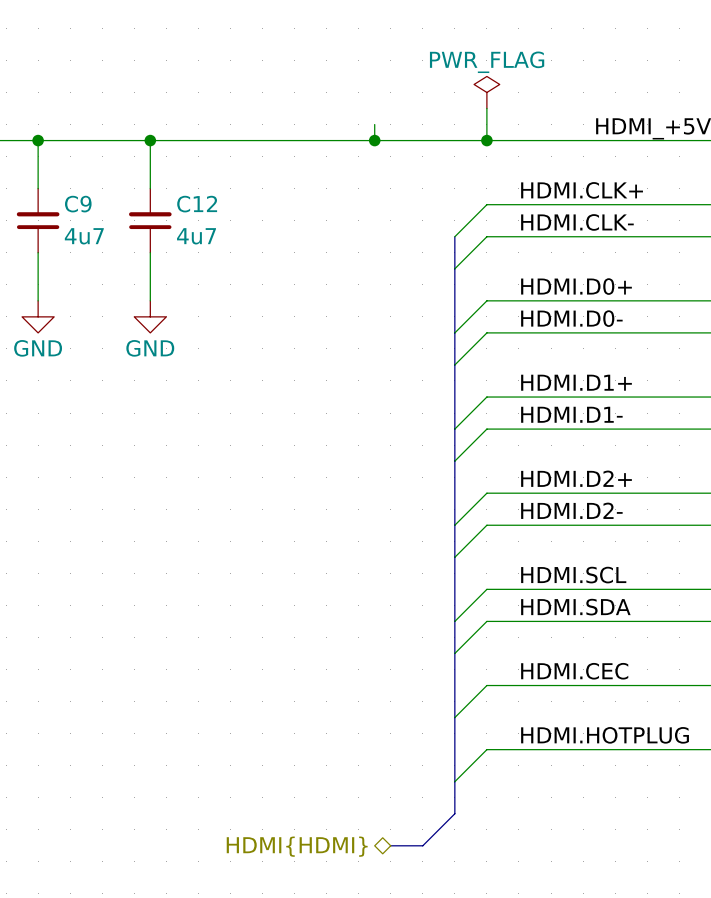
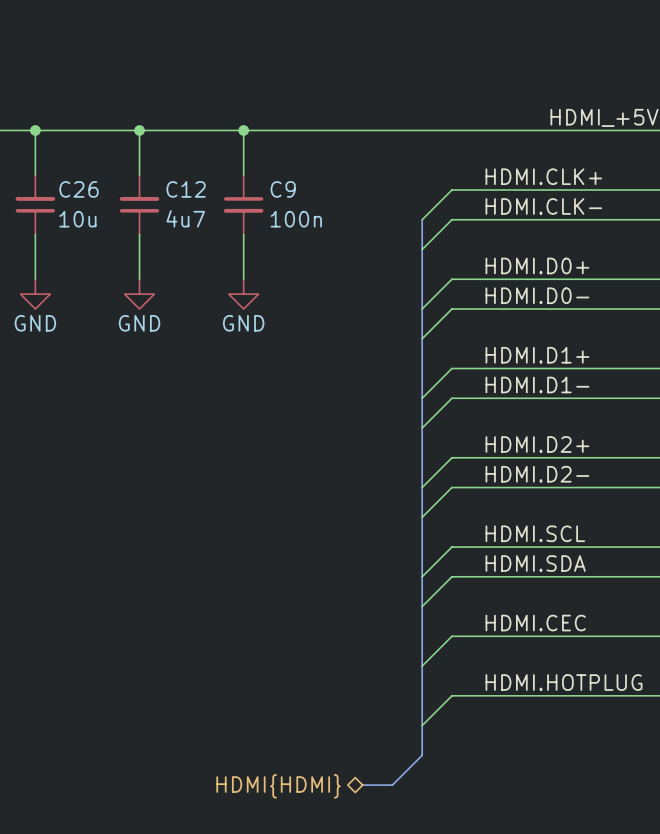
power symbol: PWR_FLAG (486, 92) -> none
wire: (486, 108) (486, 140) -> none
wire: (374, 124) (374, 140) -> none
wire: none -> (243, 130) (243, 175)
junction: none -> (243, 130)
junction: (374, 140) -> none
junction: (486, 140) -> none
C9 name: C9 (78, 204) -> C26 (78, 189)
C9: none -> (243, 204)
C9 text: 4u7 (84, 236) -> 10u (77, 219)
wire: none -> (243, 234) (243, 279)
power symbol: none -> GND (243, 294)

